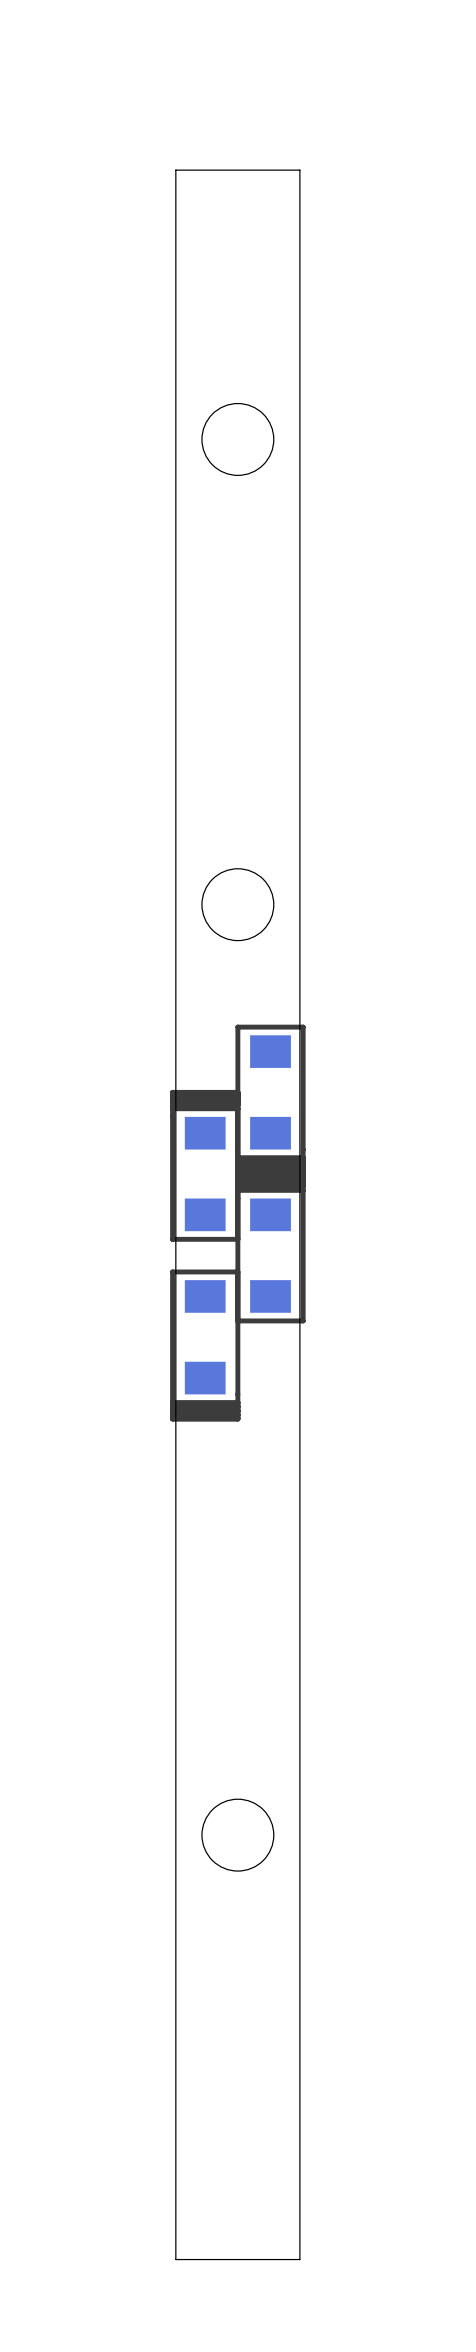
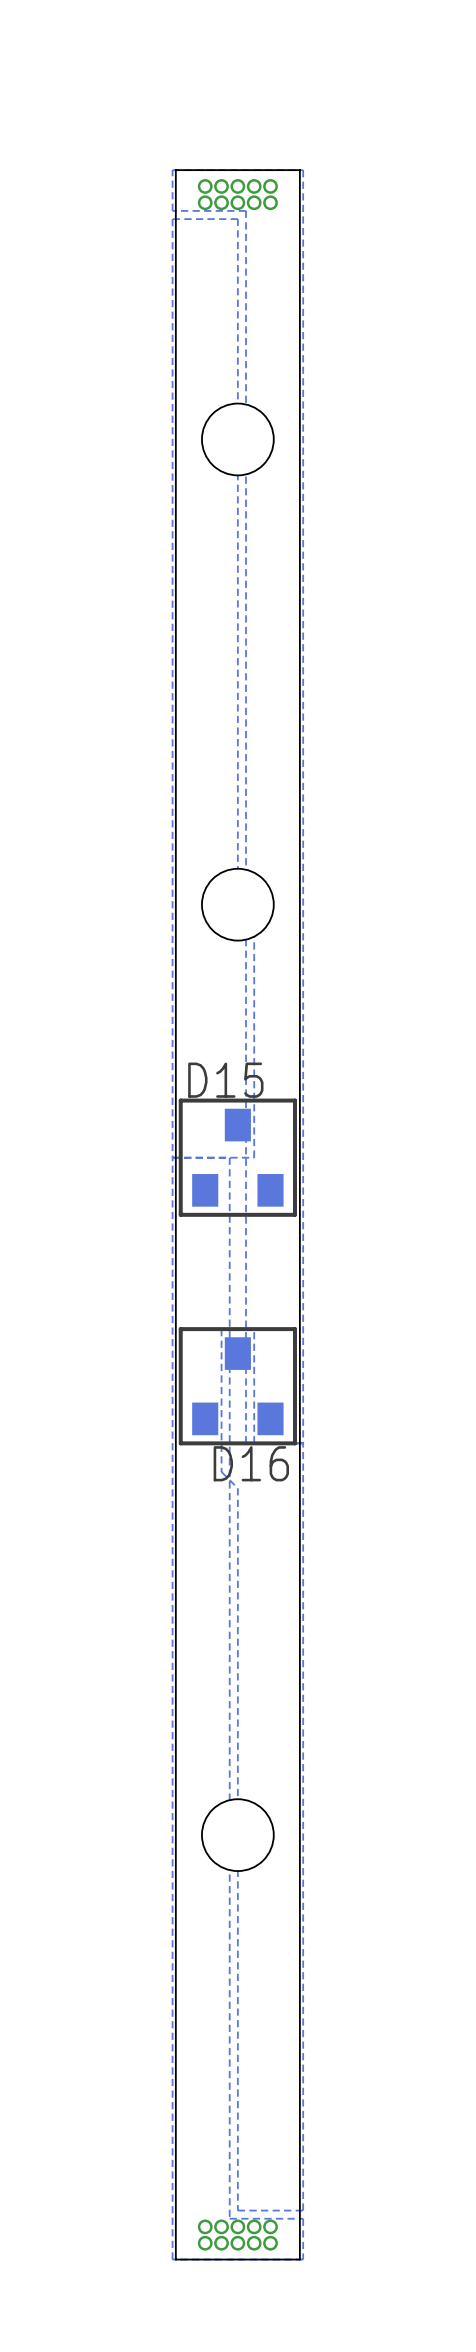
via: none -> (205, 186)
via: none -> (221, 186)
via: none -> (237, 186)
via: none -> (254, 186)
via: none -> (270, 186)
via: none -> (205, 202)
via: none -> (221, 202)
via: none -> (237, 202)
via: none -> (254, 202)
via: none -> (270, 202)
part: (270, 1100) -> none
zone outline: none -> (229, 1157) (229, 2218) (303, 2218) (303, 2259) (172, 2259) (172, 219) (237, 219) (237, 896) (254, 912) (254, 1157) (172, 1157)
D15: none -> (237, 1157)
part: (205, 1165) -> none
part: (270, 1247) -> none
part: (205, 1345) -> none
D16: none -> (237, 1386)
zone outline: none -> (303, 1443) (246, 1443) (246, 210) (172, 210) (172, 170) (303, 170) (303, 2210) (237, 2210) (237, 1488) (221, 1471) (221, 1329) (254, 1329) (254, 1443)
via: none -> (205, 2226)
via: none -> (221, 2226)
via: none -> (237, 2226)
via: none -> (254, 2226)
via: none -> (270, 2226)
via: none -> (205, 2243)
via: none -> (221, 2243)
via: none -> (237, 2243)
via: none -> (254, 2243)
via: none -> (270, 2243)

